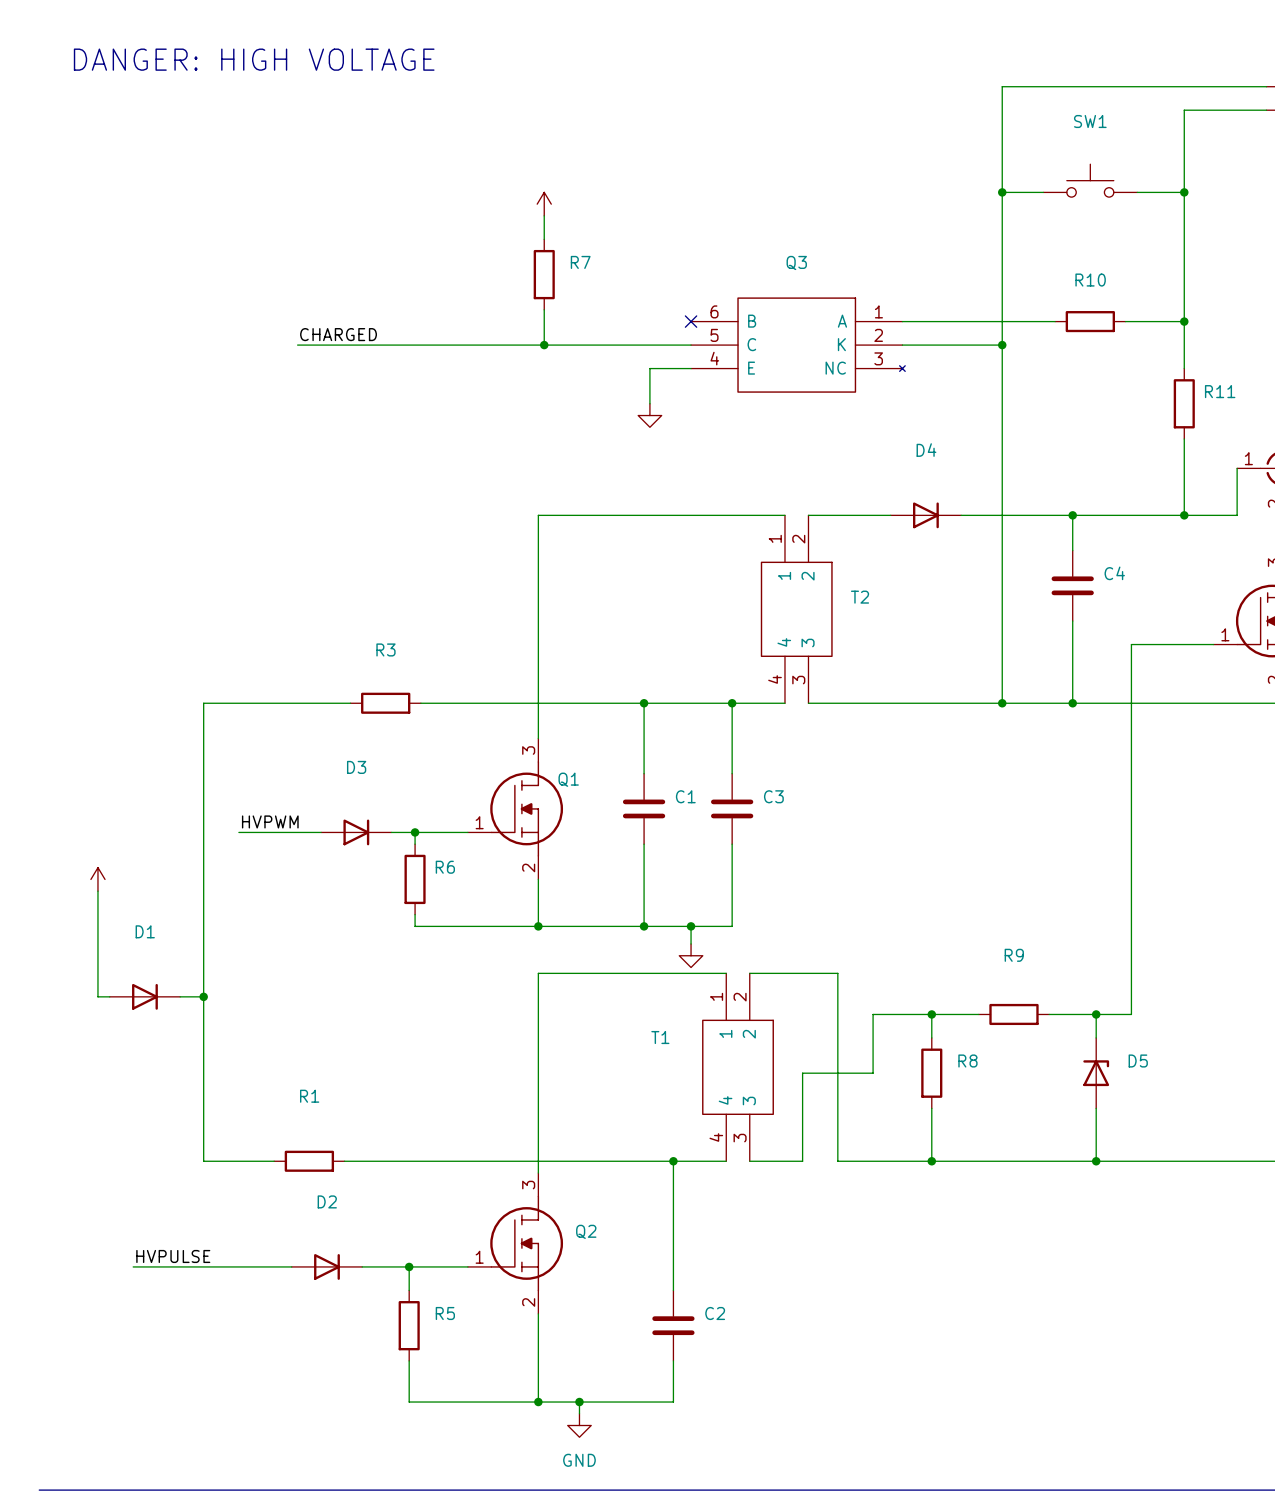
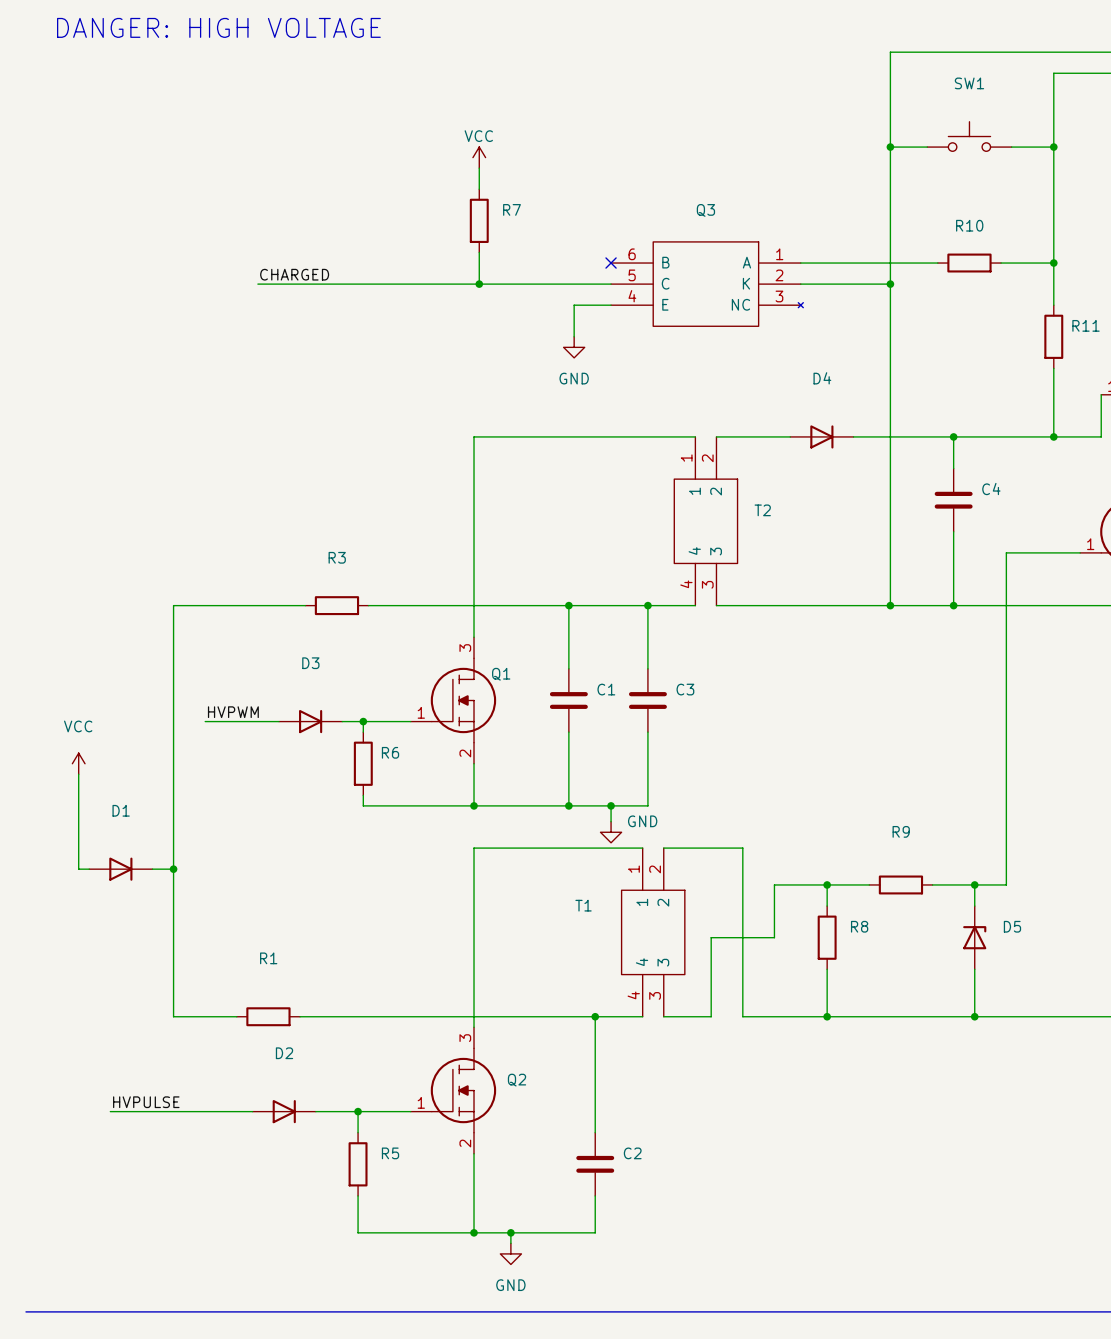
power symbol text: none -> VCC (478, 136)
power symbol text: none -> GND (574, 378)
power symbol text: none -> VCC (78, 726)
power symbol text: none -> GND (642, 821)

